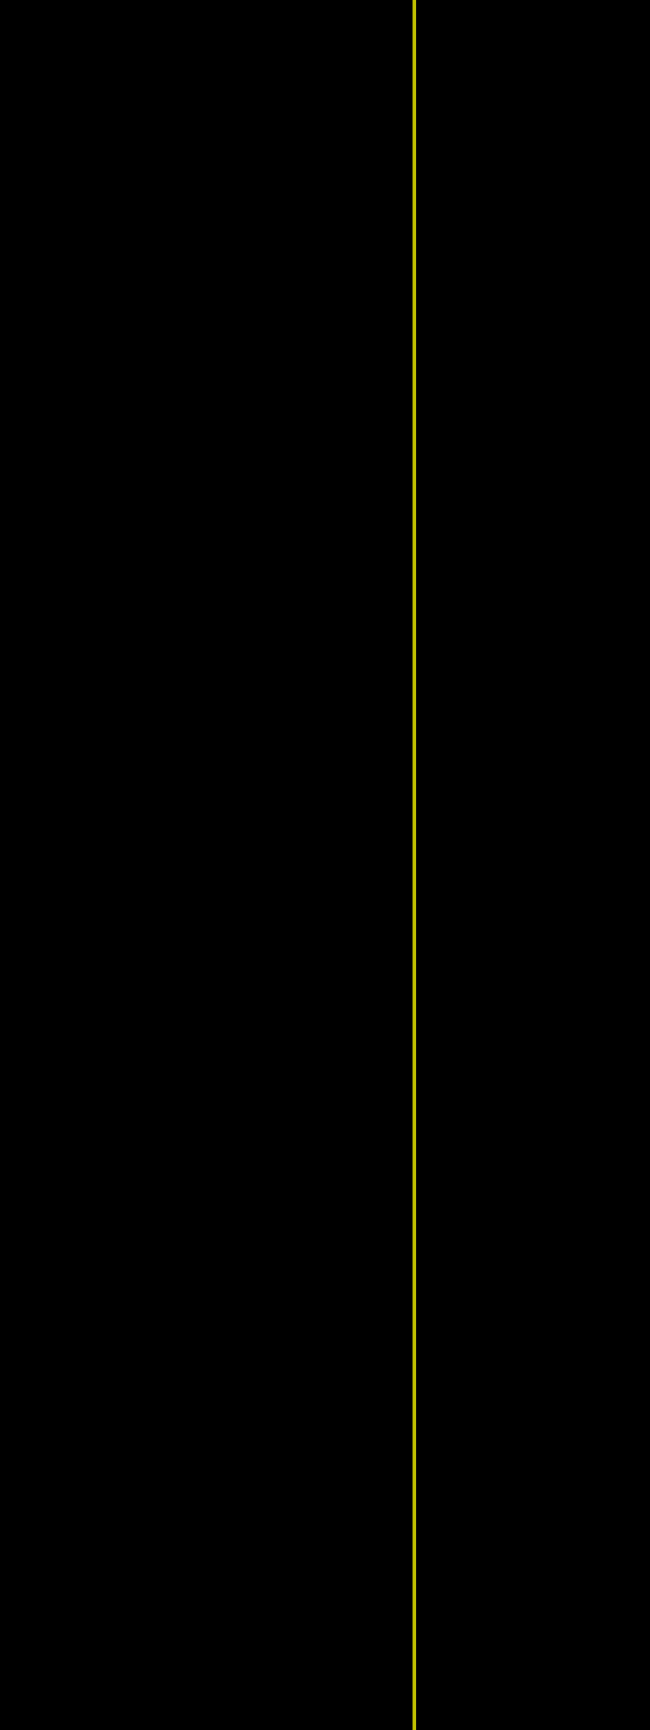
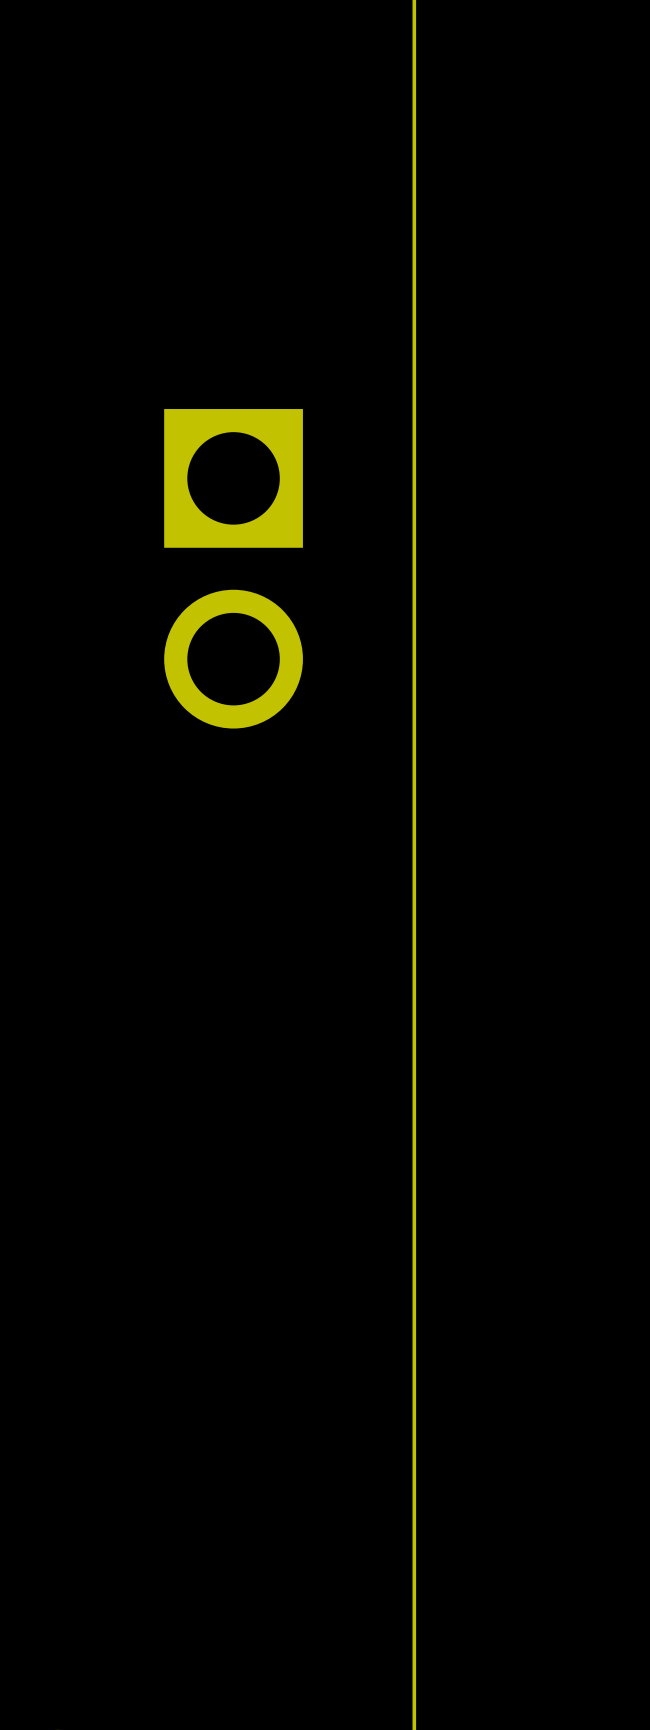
part: none -> (233, 568)

